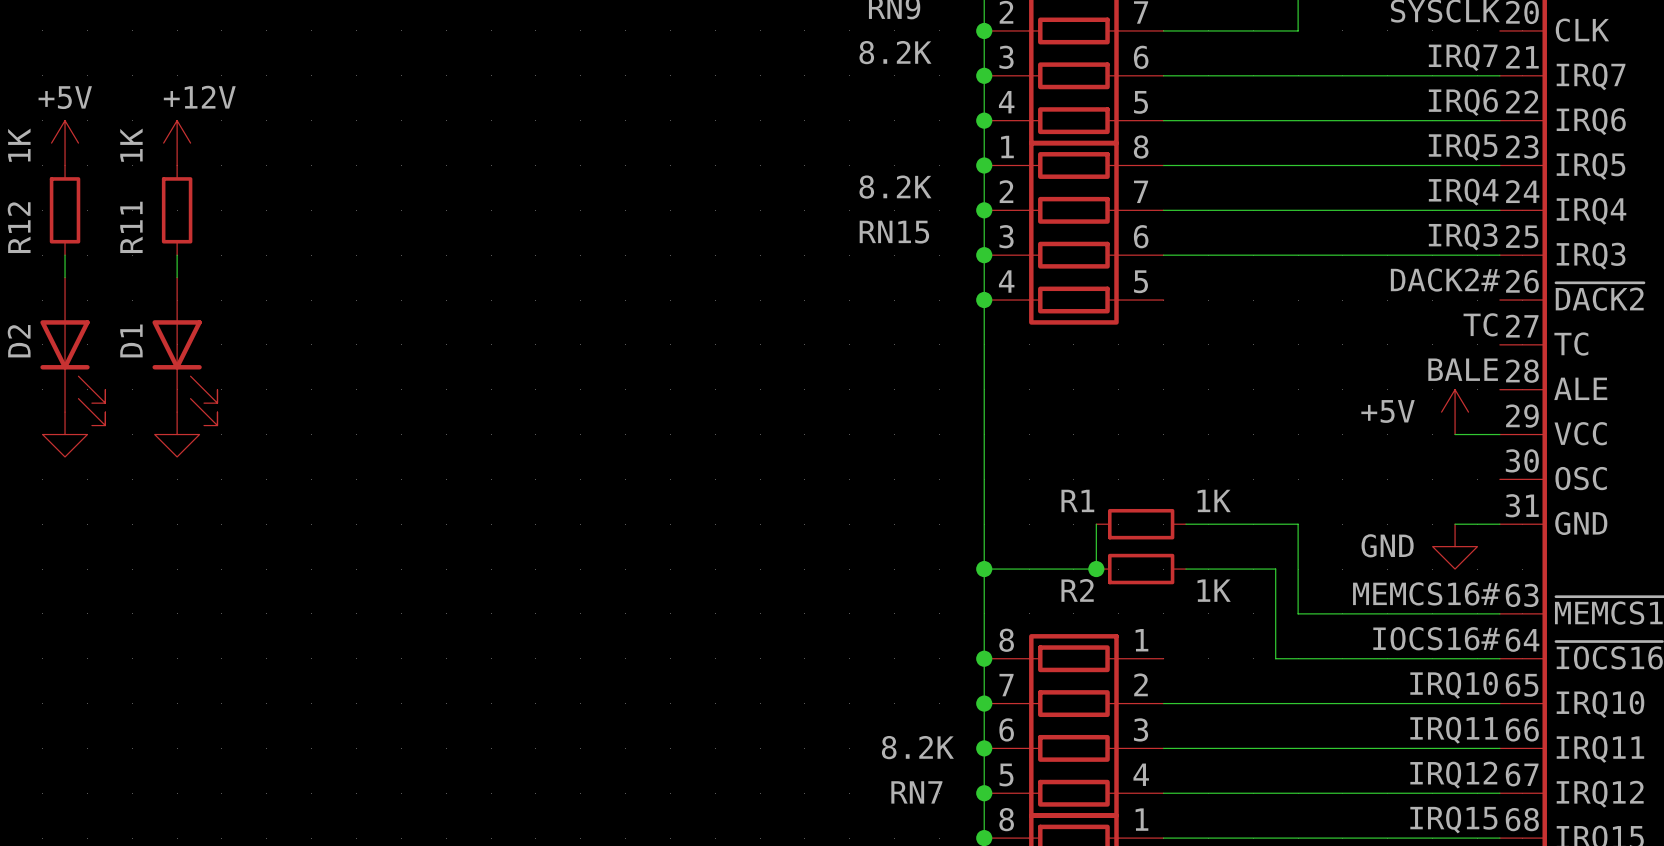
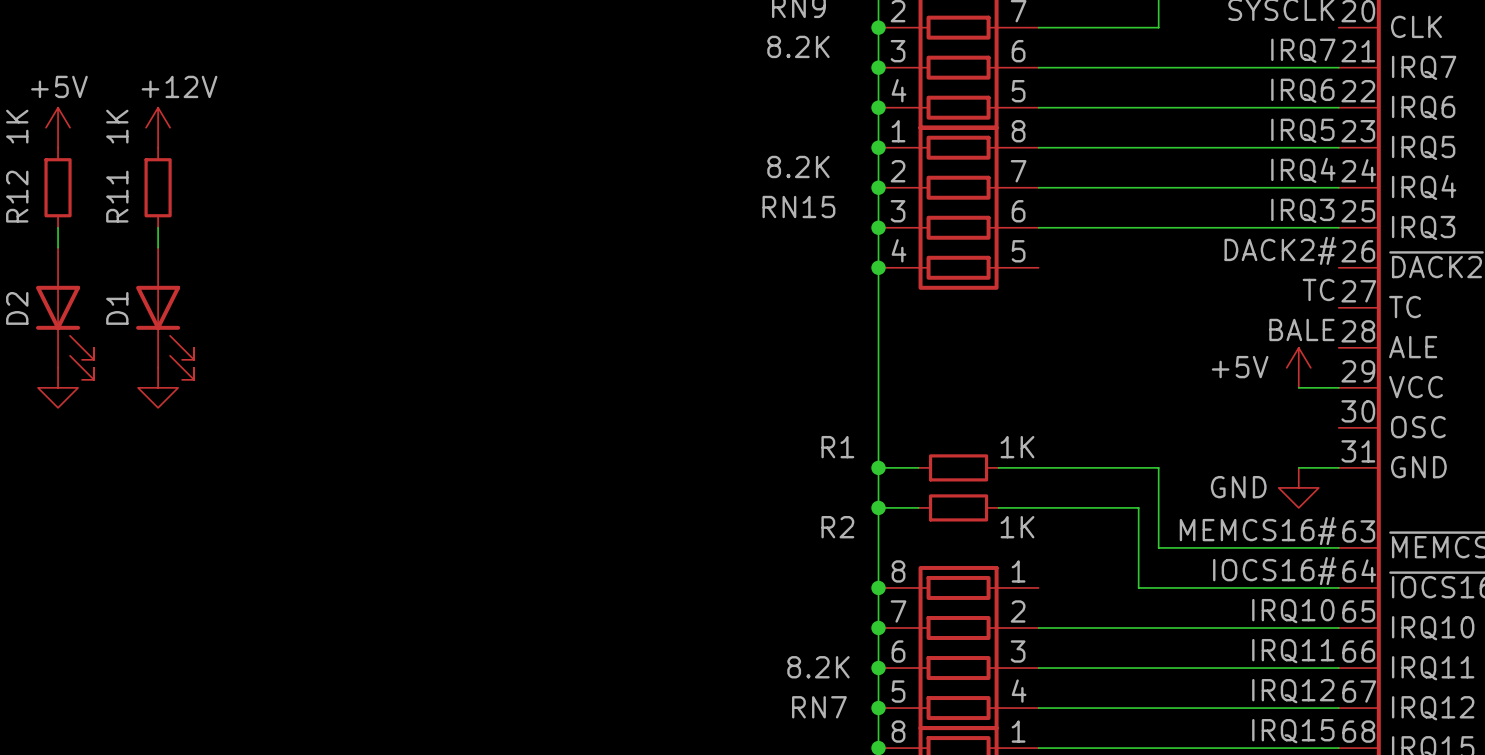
R1 name position: R1 (1077, 500) -> R1 (837, 447)
wire: none -> (878, 467) (918, 467)
junction: none -> (878, 467)
wire: (1096, 524) (1096, 569) (1029, 569) -> none
wire: none -> (998, 467) (1058, 467)
R1 position: (1141, 524) -> (958, 467)
junction: (1096, 569) -> none
wire: none -> (998, 507) (1058, 507)
R2 position: (1141, 569) -> (958, 507)
R2 name position: R2 (1077, 590) -> R2 (837, 527)

